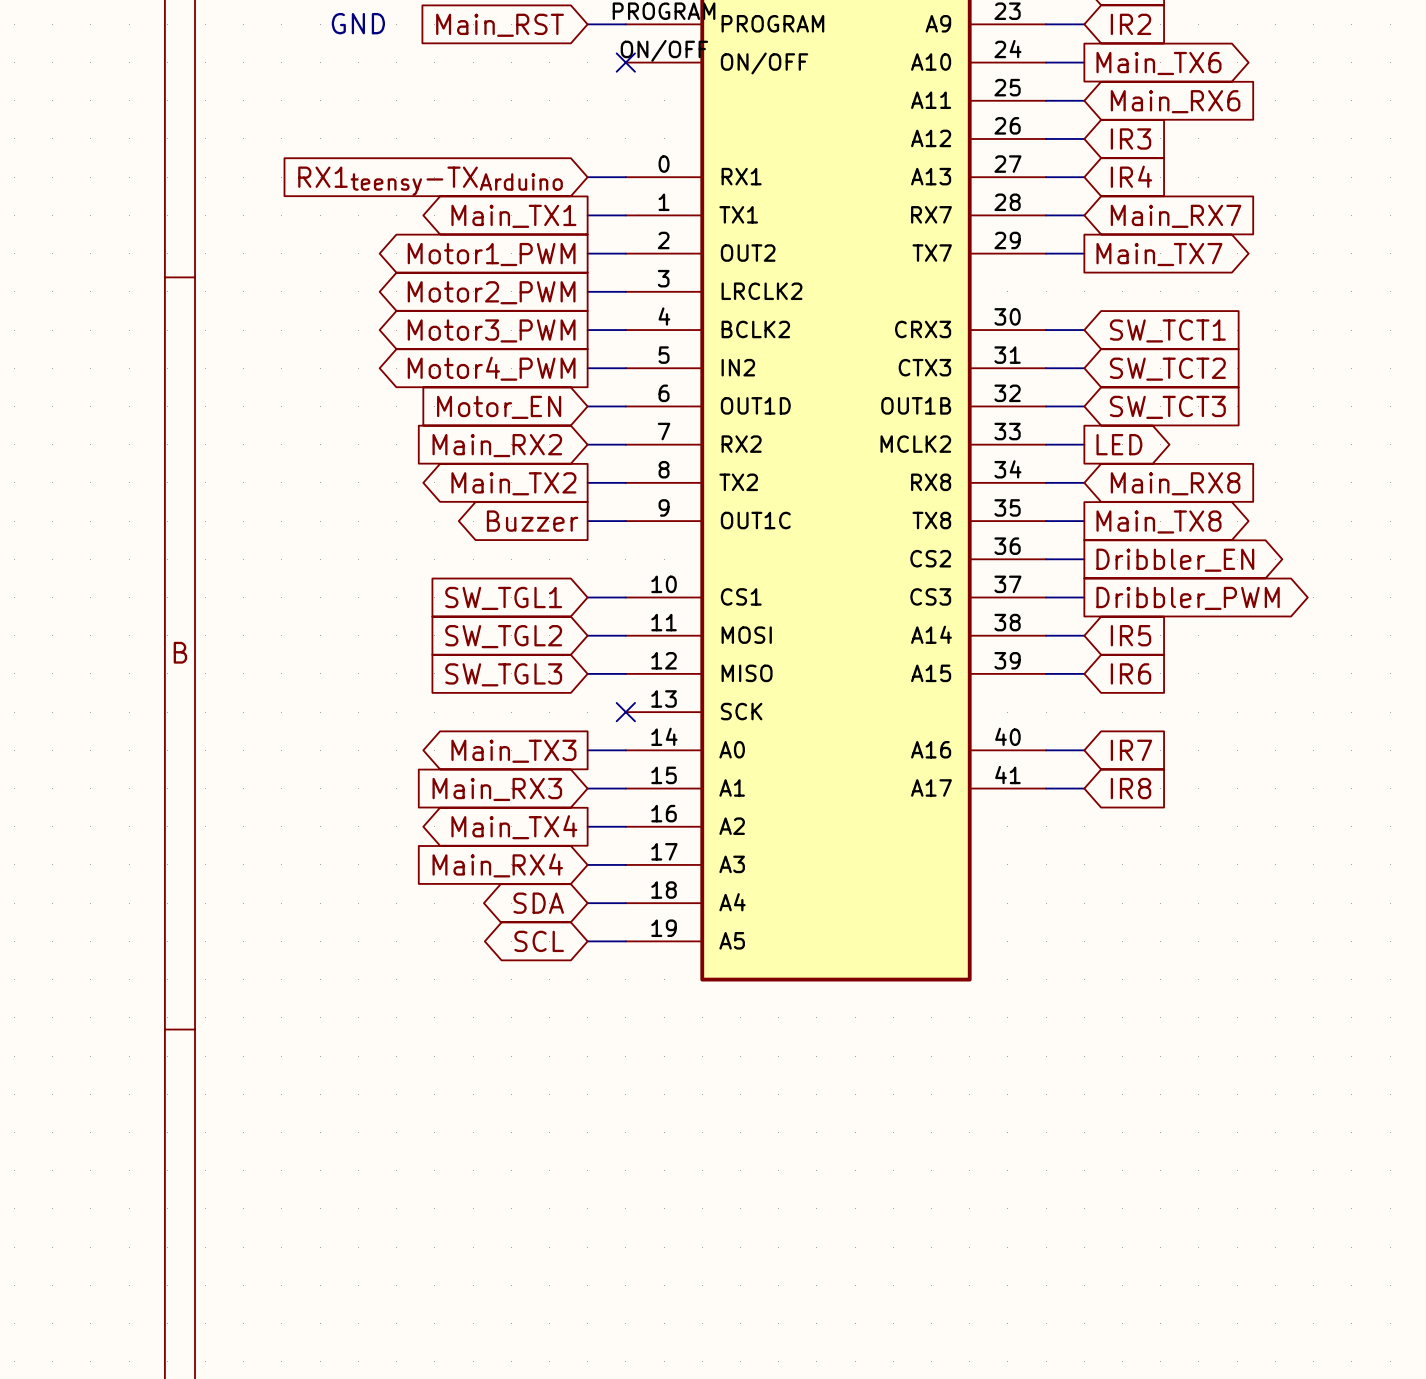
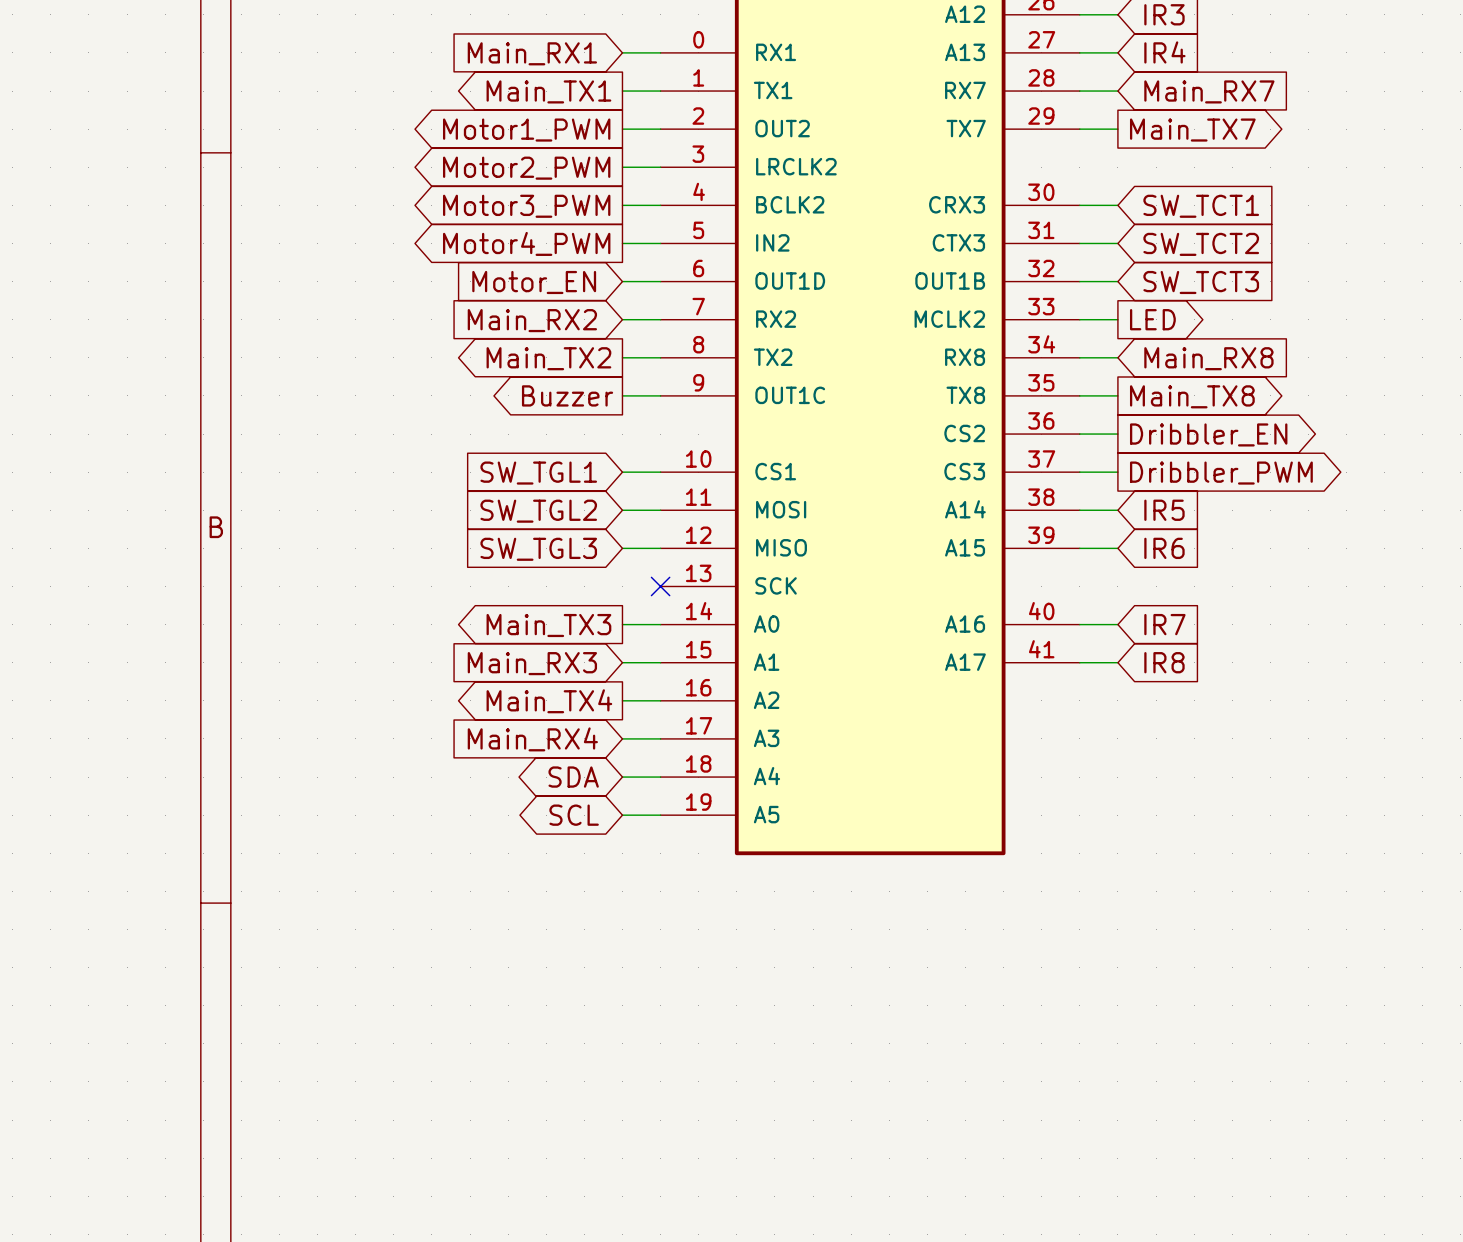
global label: RX1teensy-TXArduino (430, 181) -> Main_RX1 (532, 53)

